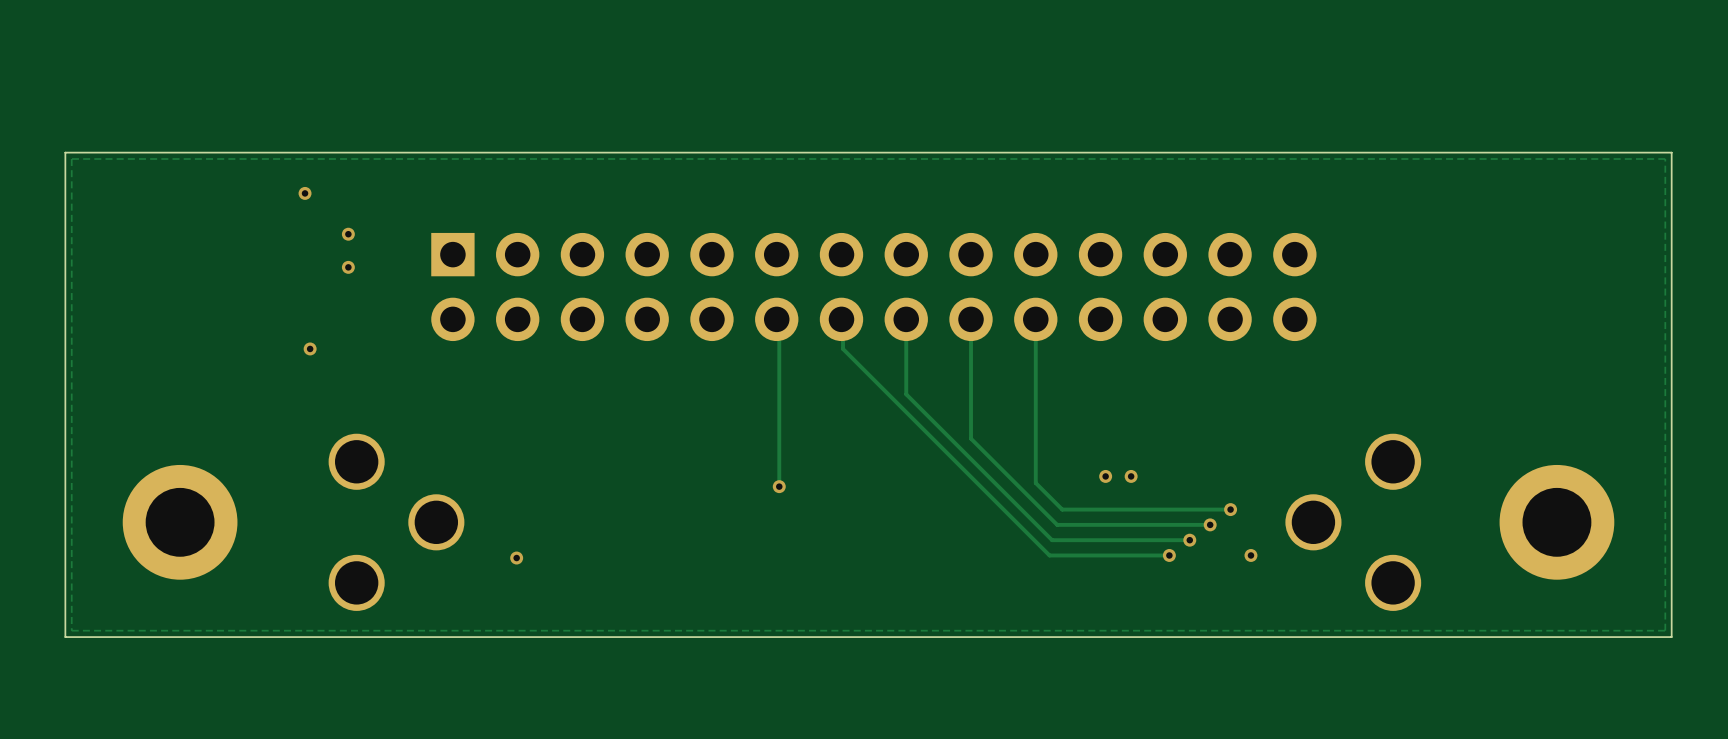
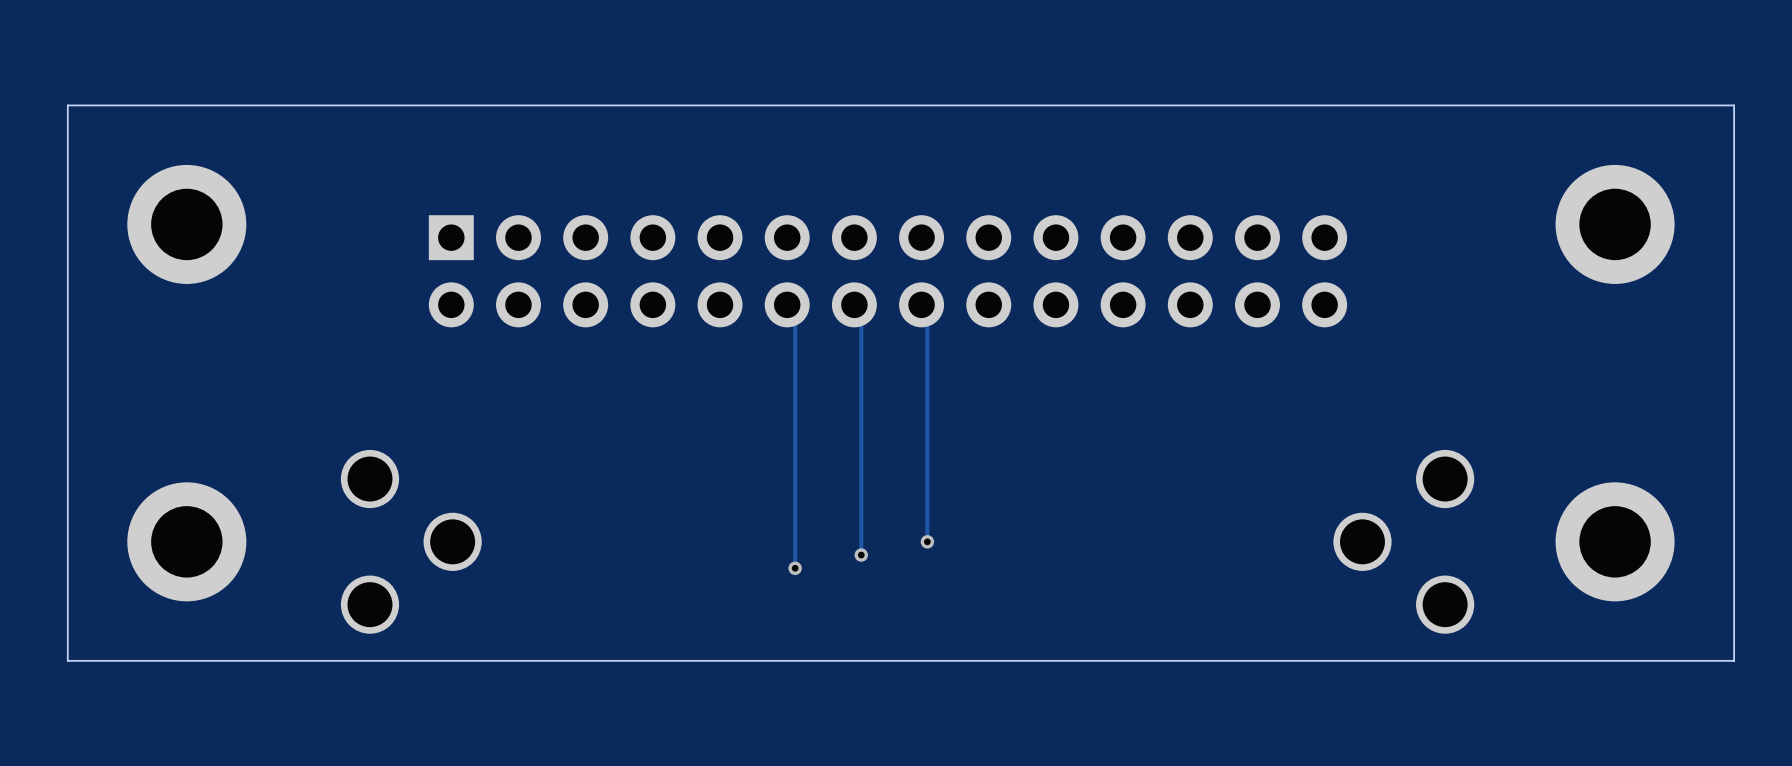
board edge: (1671, 152) (65, 152) -> (1734, 158) (1734, 105) (67, 105) (67, 158)
zone outline: (1665, 159) (71, 159) (71, 630) (1665, 630) (1665, 159) -> none
via: (305, 193) -> none
part: none -> (186, 224)
part: none -> (1615, 224)
via: (348, 234) -> none
via: (348, 267) -> none
part position: (873, 286) -> (887, 271)
track: none -> (787, 304) (795, 312) (795, 568)
track: none -> (854, 304) (861, 311) (861, 555)
track: none -> (921, 304) (927, 310) (927, 541)
track: (776, 319) (779, 321) (779, 486) -> none
track: (841, 319) (843, 348) (1049, 555) (1169, 555) -> none
track: (906, 319) (906, 394) (1052, 540) (1189, 540) -> none
track: (971, 319) (971, 438) (1057, 524) (1210, 524) -> none
track: (1035, 319) (1035, 483) (1062, 509) (1230, 509) -> none
via: (310, 348) -> none
via: (1105, 476) -> none
via: (1131, 476) -> none
via: (779, 486) -> none
via: (1230, 509) -> none
via: none -> (927, 541)
via: (1210, 524) -> none
via: none -> (861, 555)
via: (1189, 540) -> none
via: none -> (795, 568)
via: (1169, 555) -> none
via: (1250, 555) -> none
via: (516, 558) -> none

